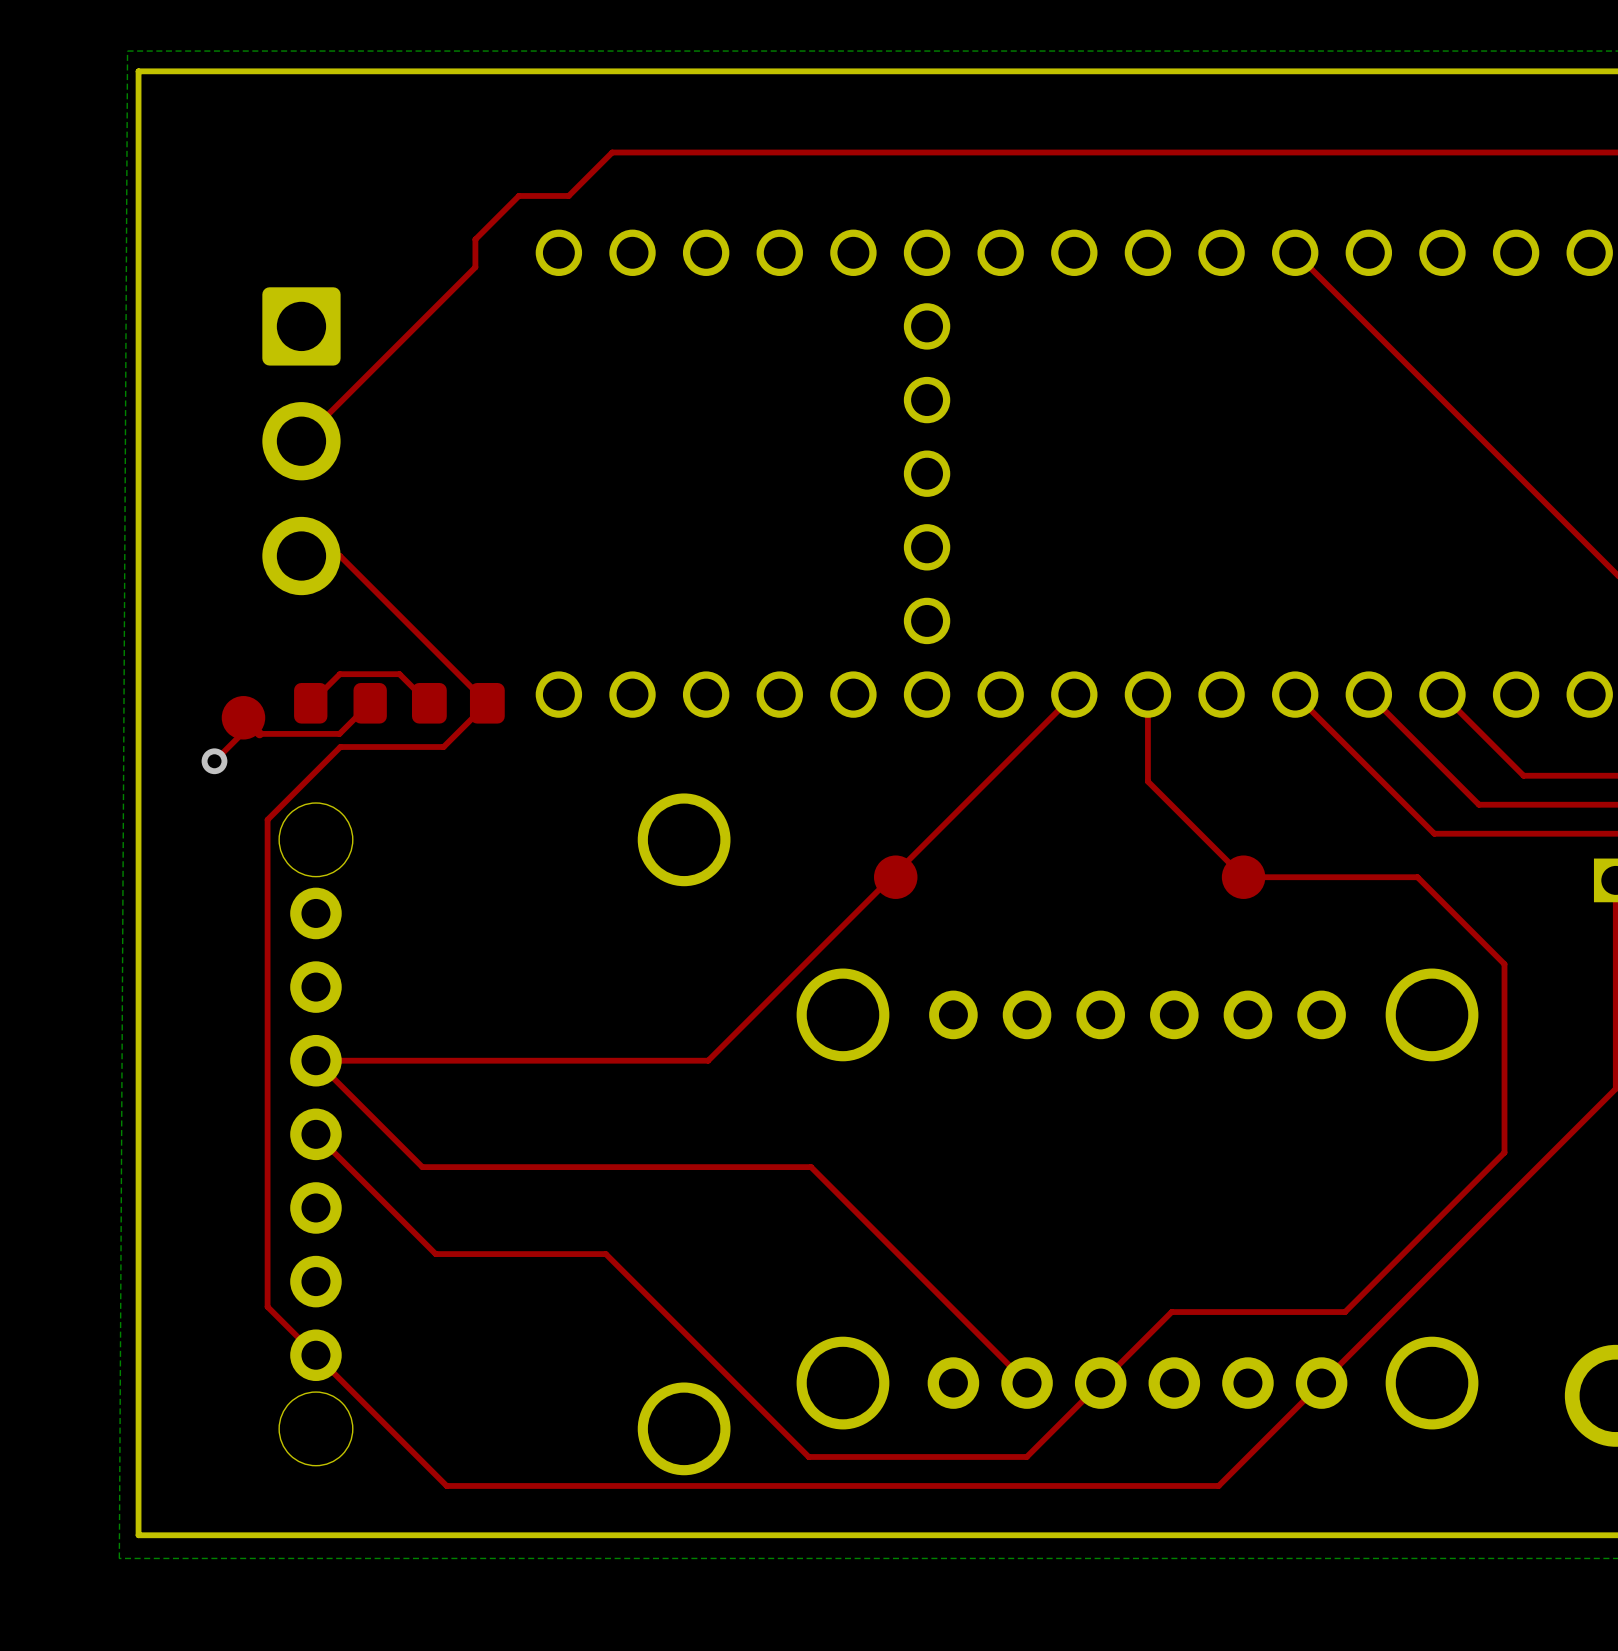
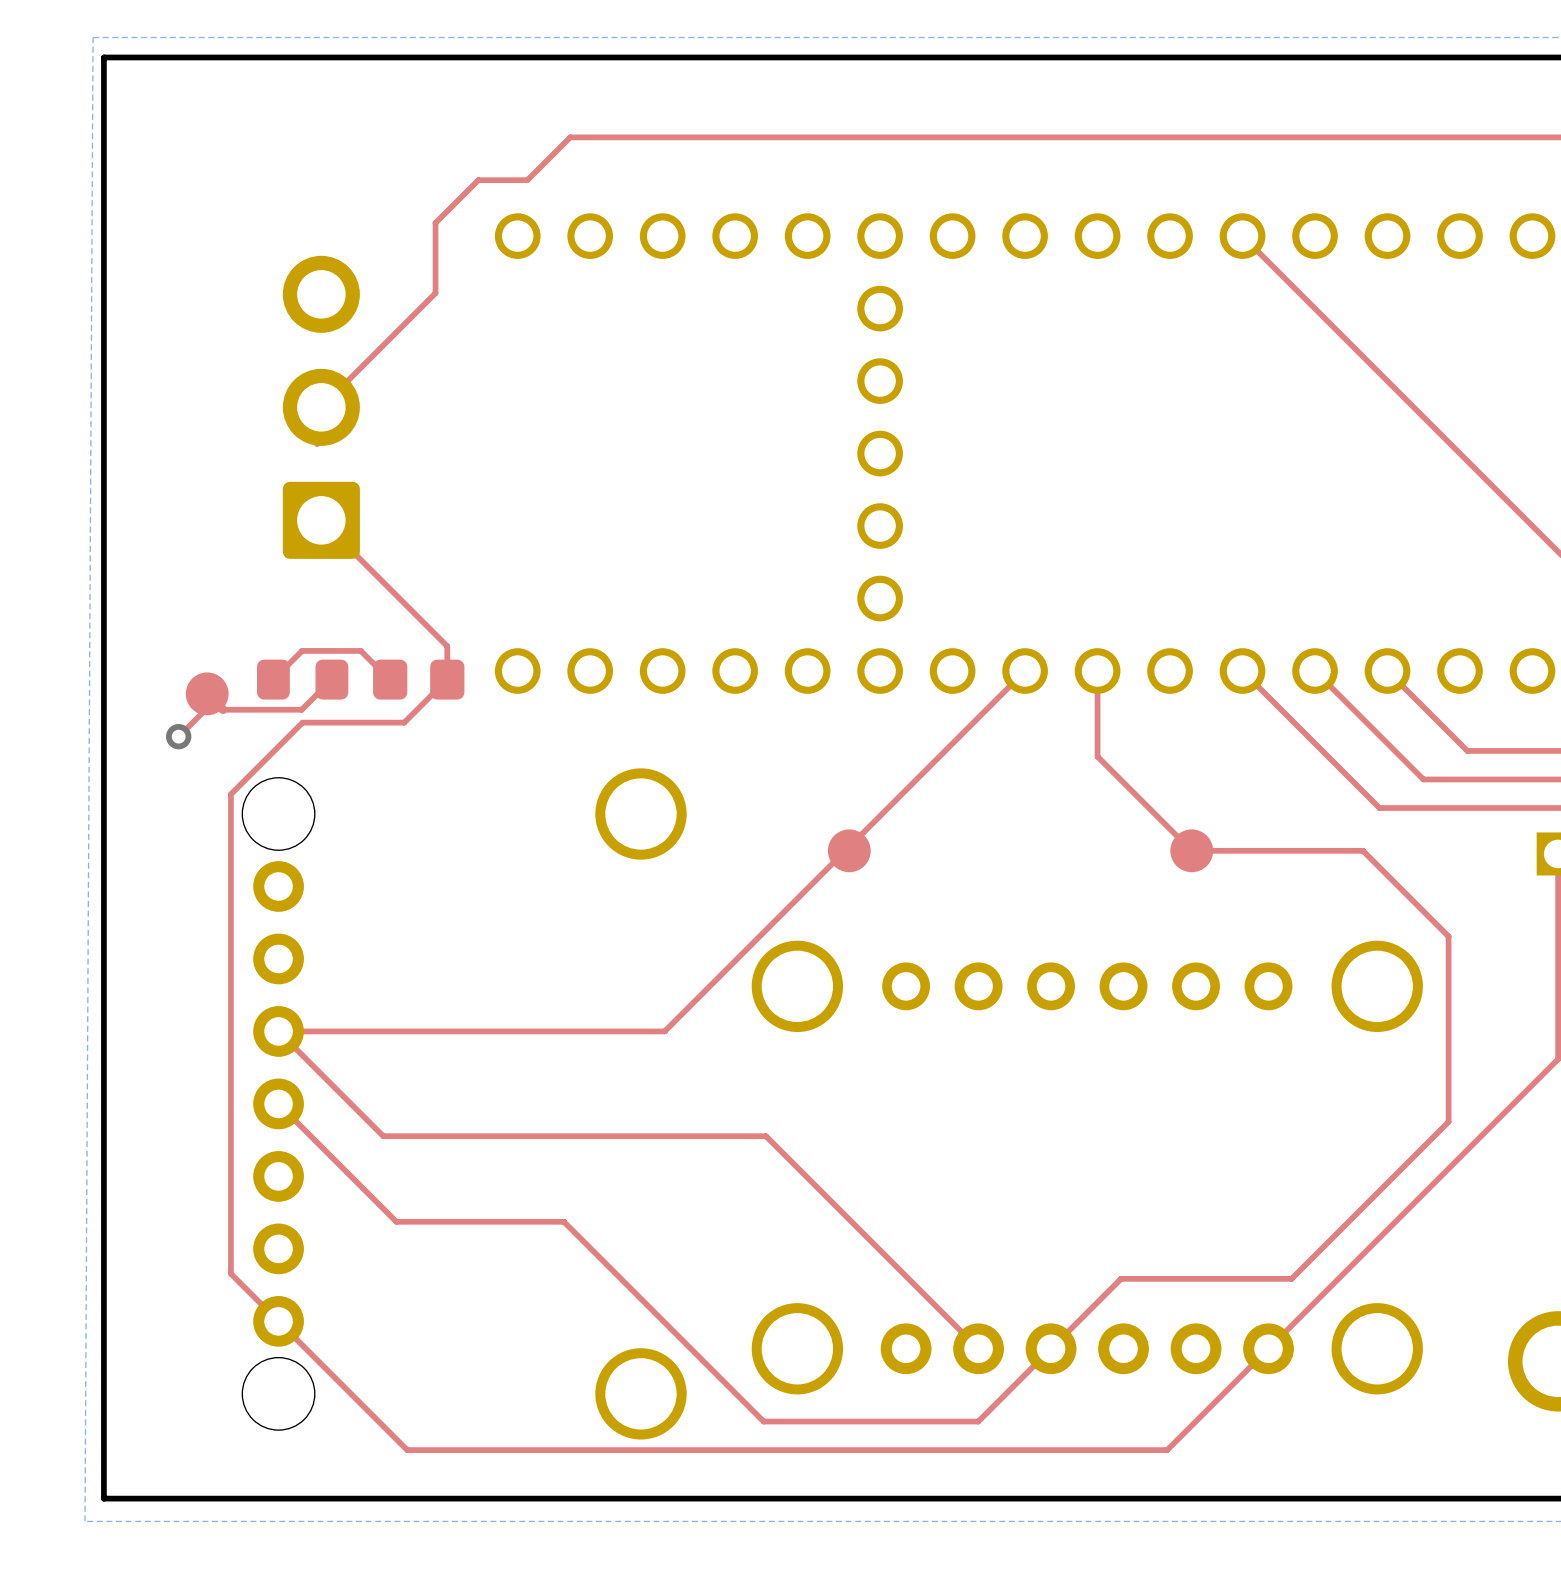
top track: (475, 267) (301, 441) -> (435, 250) (435, 293) (321, 407) (321, 386)
part rotation: 0° (301, 441) -> 180° (321, 407)
top track: (301, 556) (340, 556) (487, 703) -> (321, 520) (447, 646) (447, 679)

